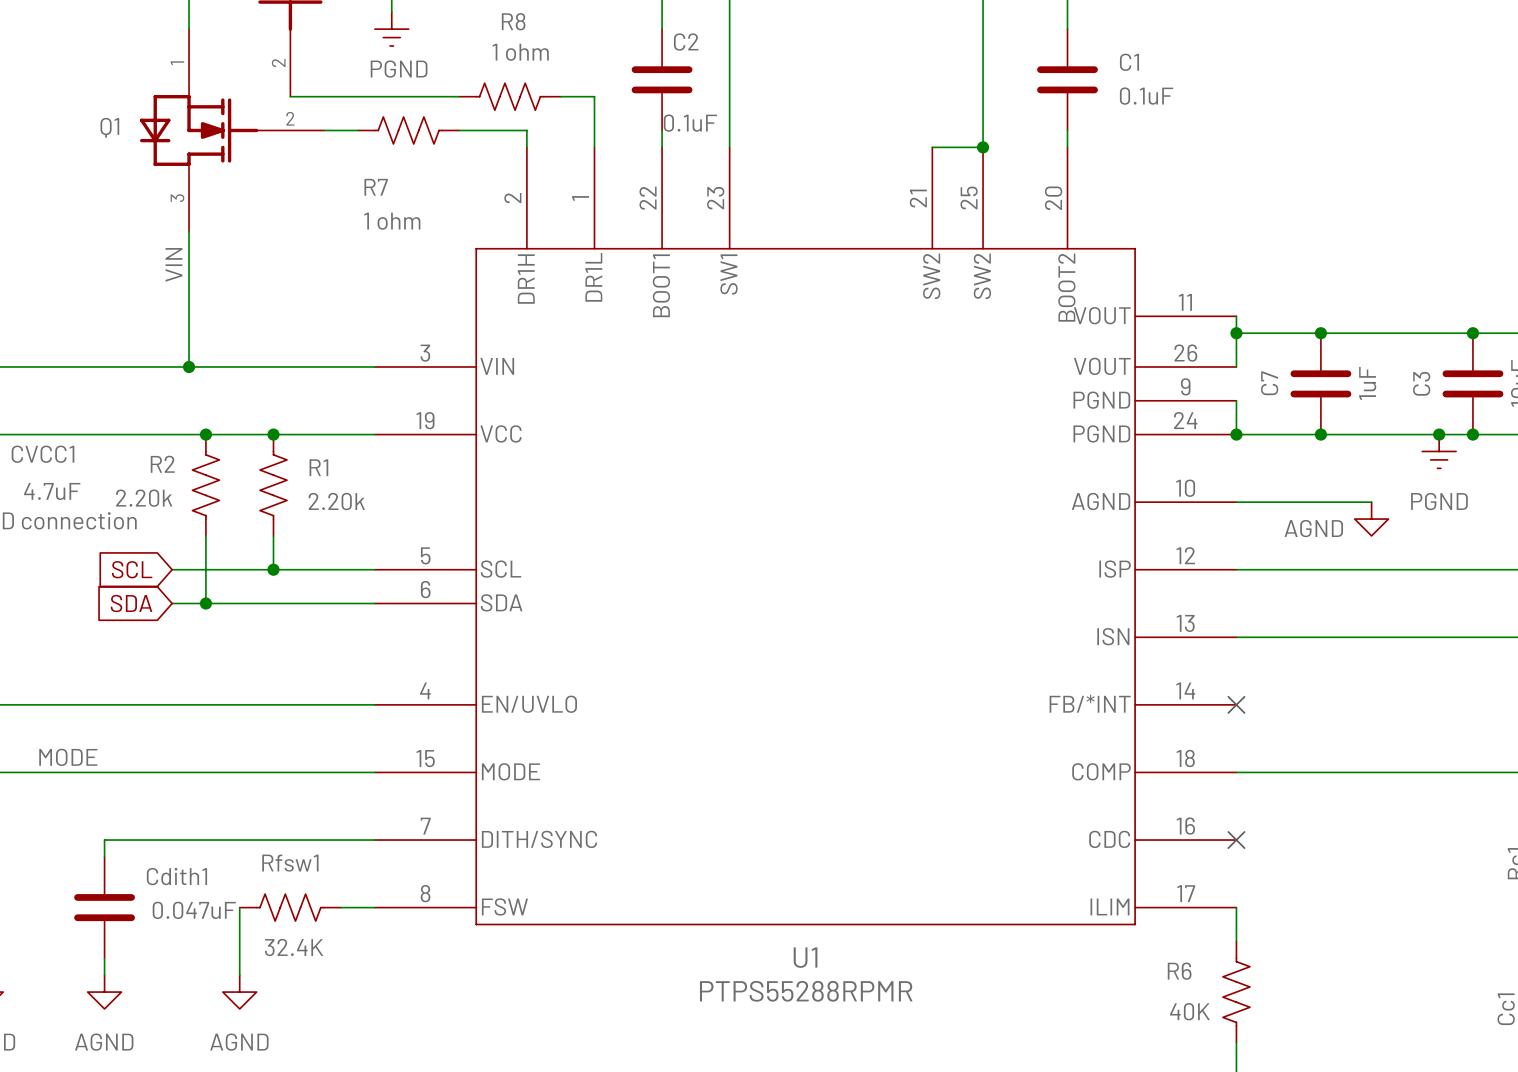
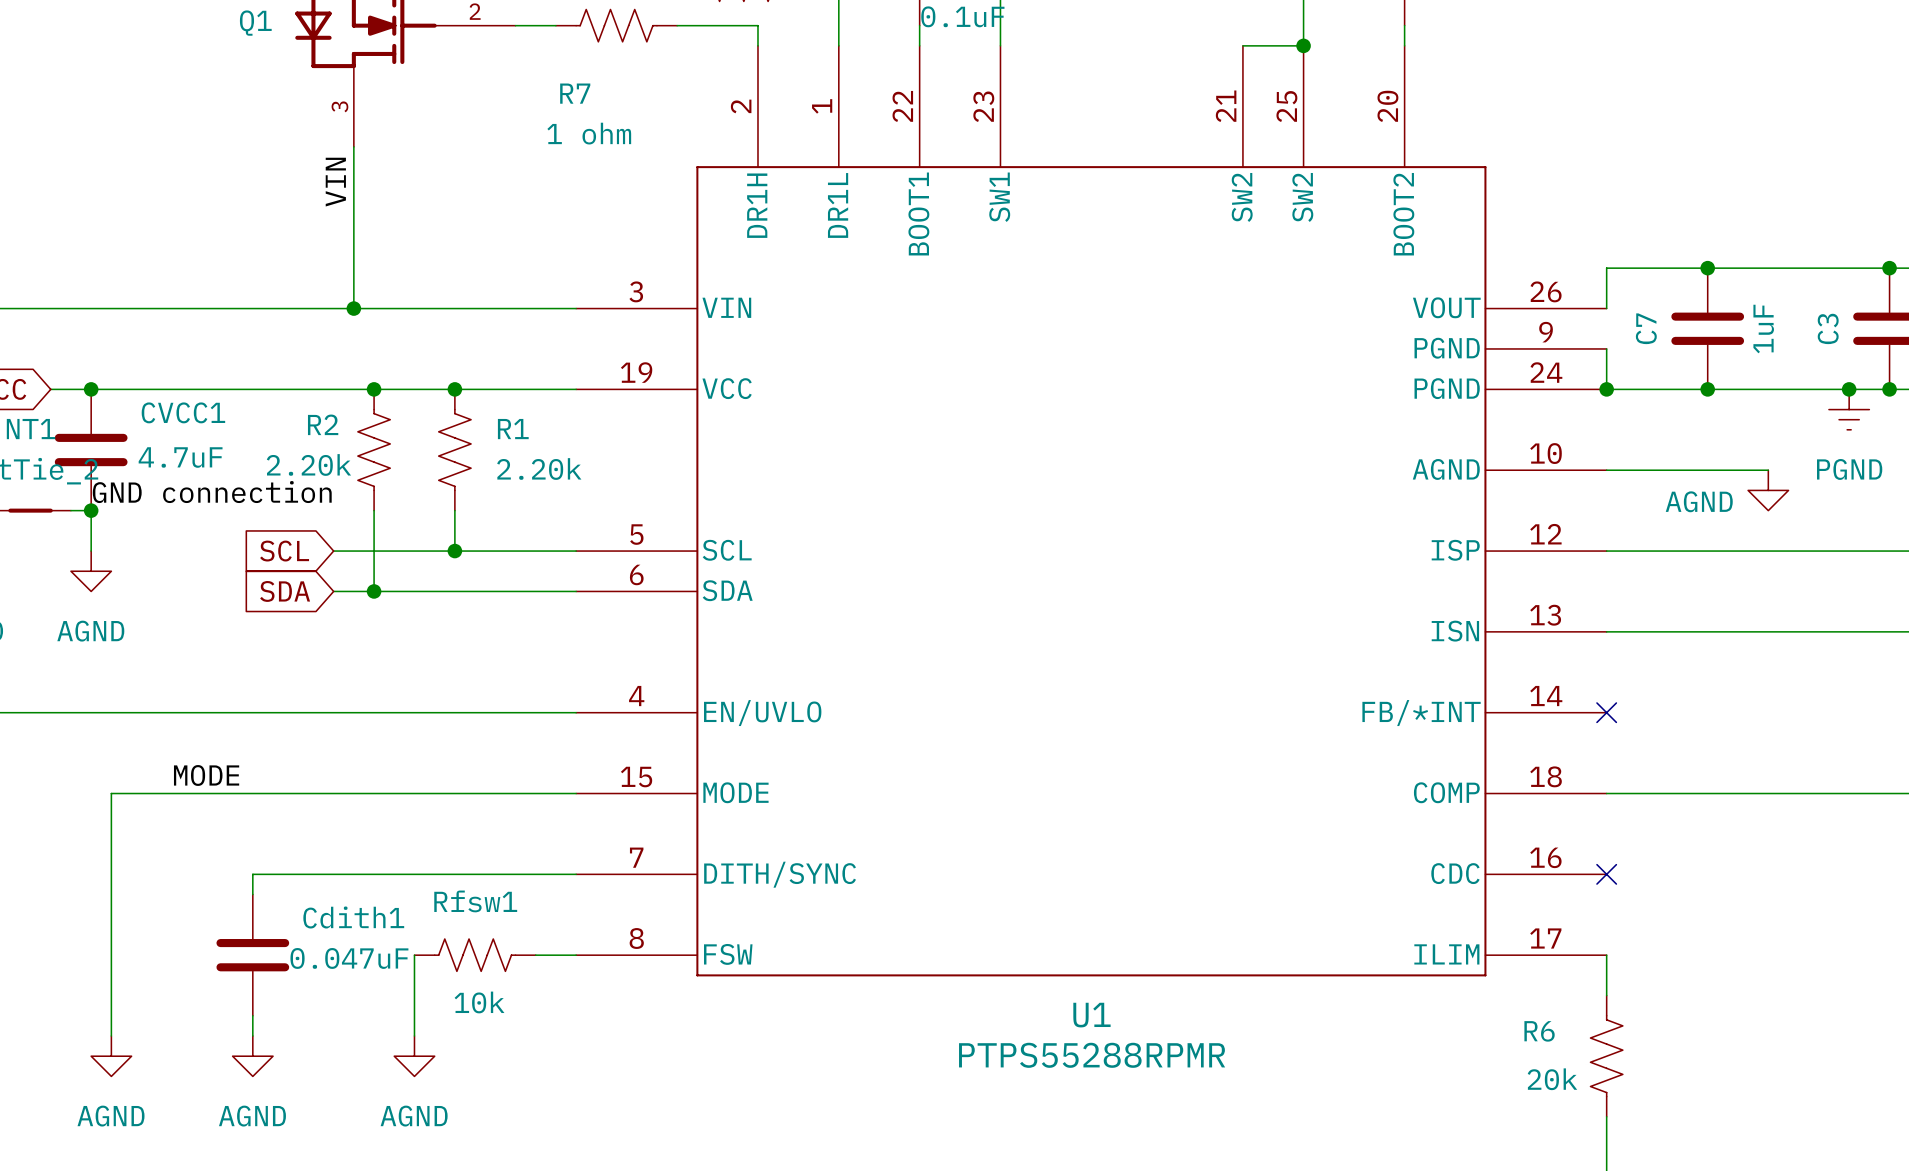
U1 symbol: [374, 147, 1237, 926] -> [576, 45, 1607, 977]
wire: (1236, 316) (1236, 333) -> none
junction: (1236, 333) -> none
Rfsw1 value: 32.4K (294, 947) -> 10k (479, 1002)
R6 value: 40K (1189, 1011) -> 20k (1552, 1079)

